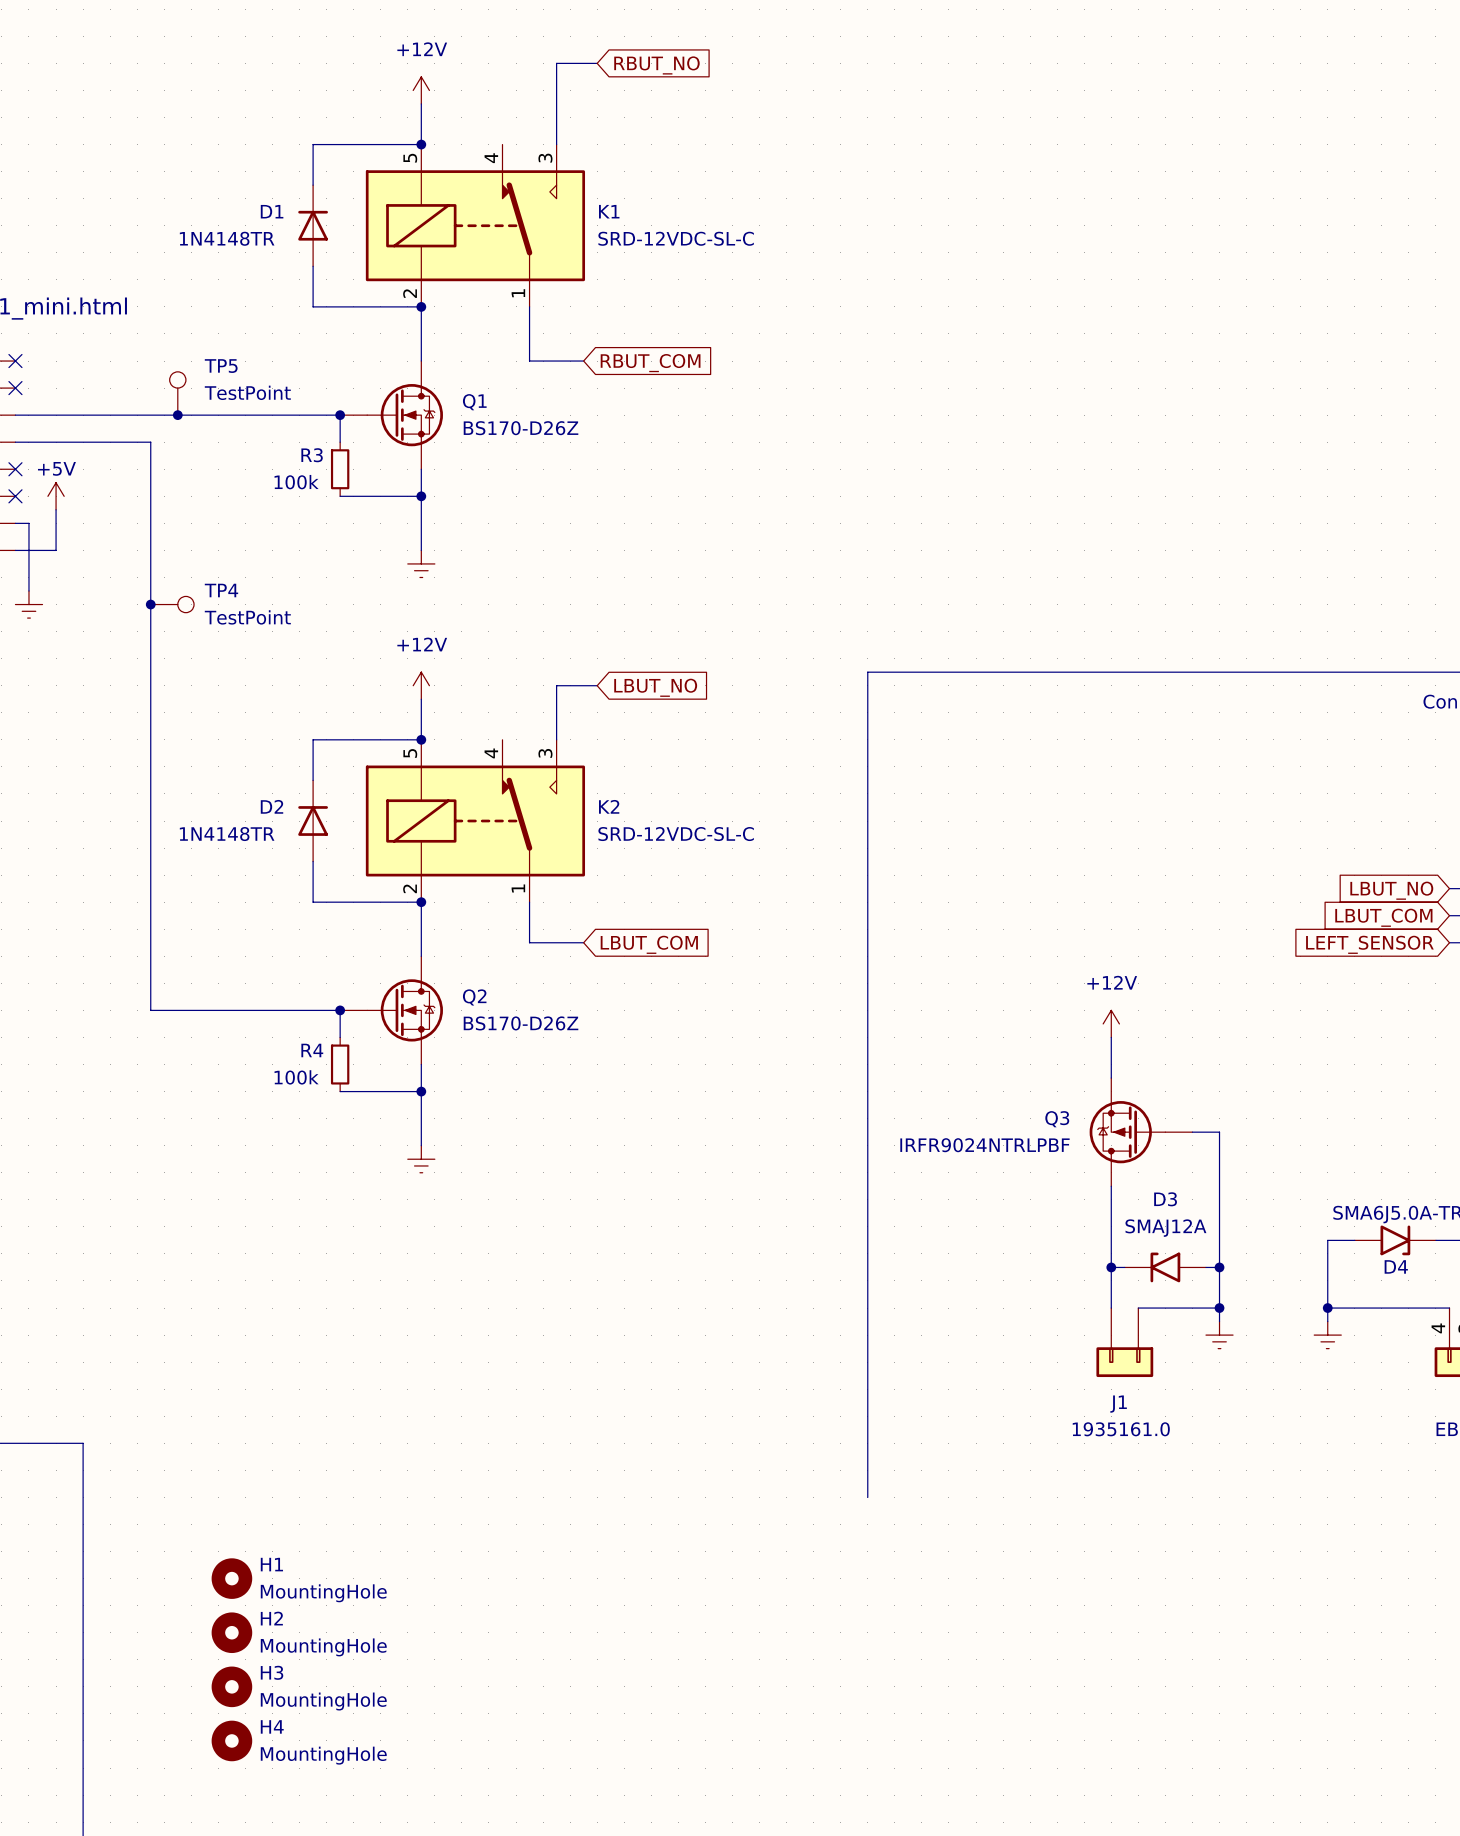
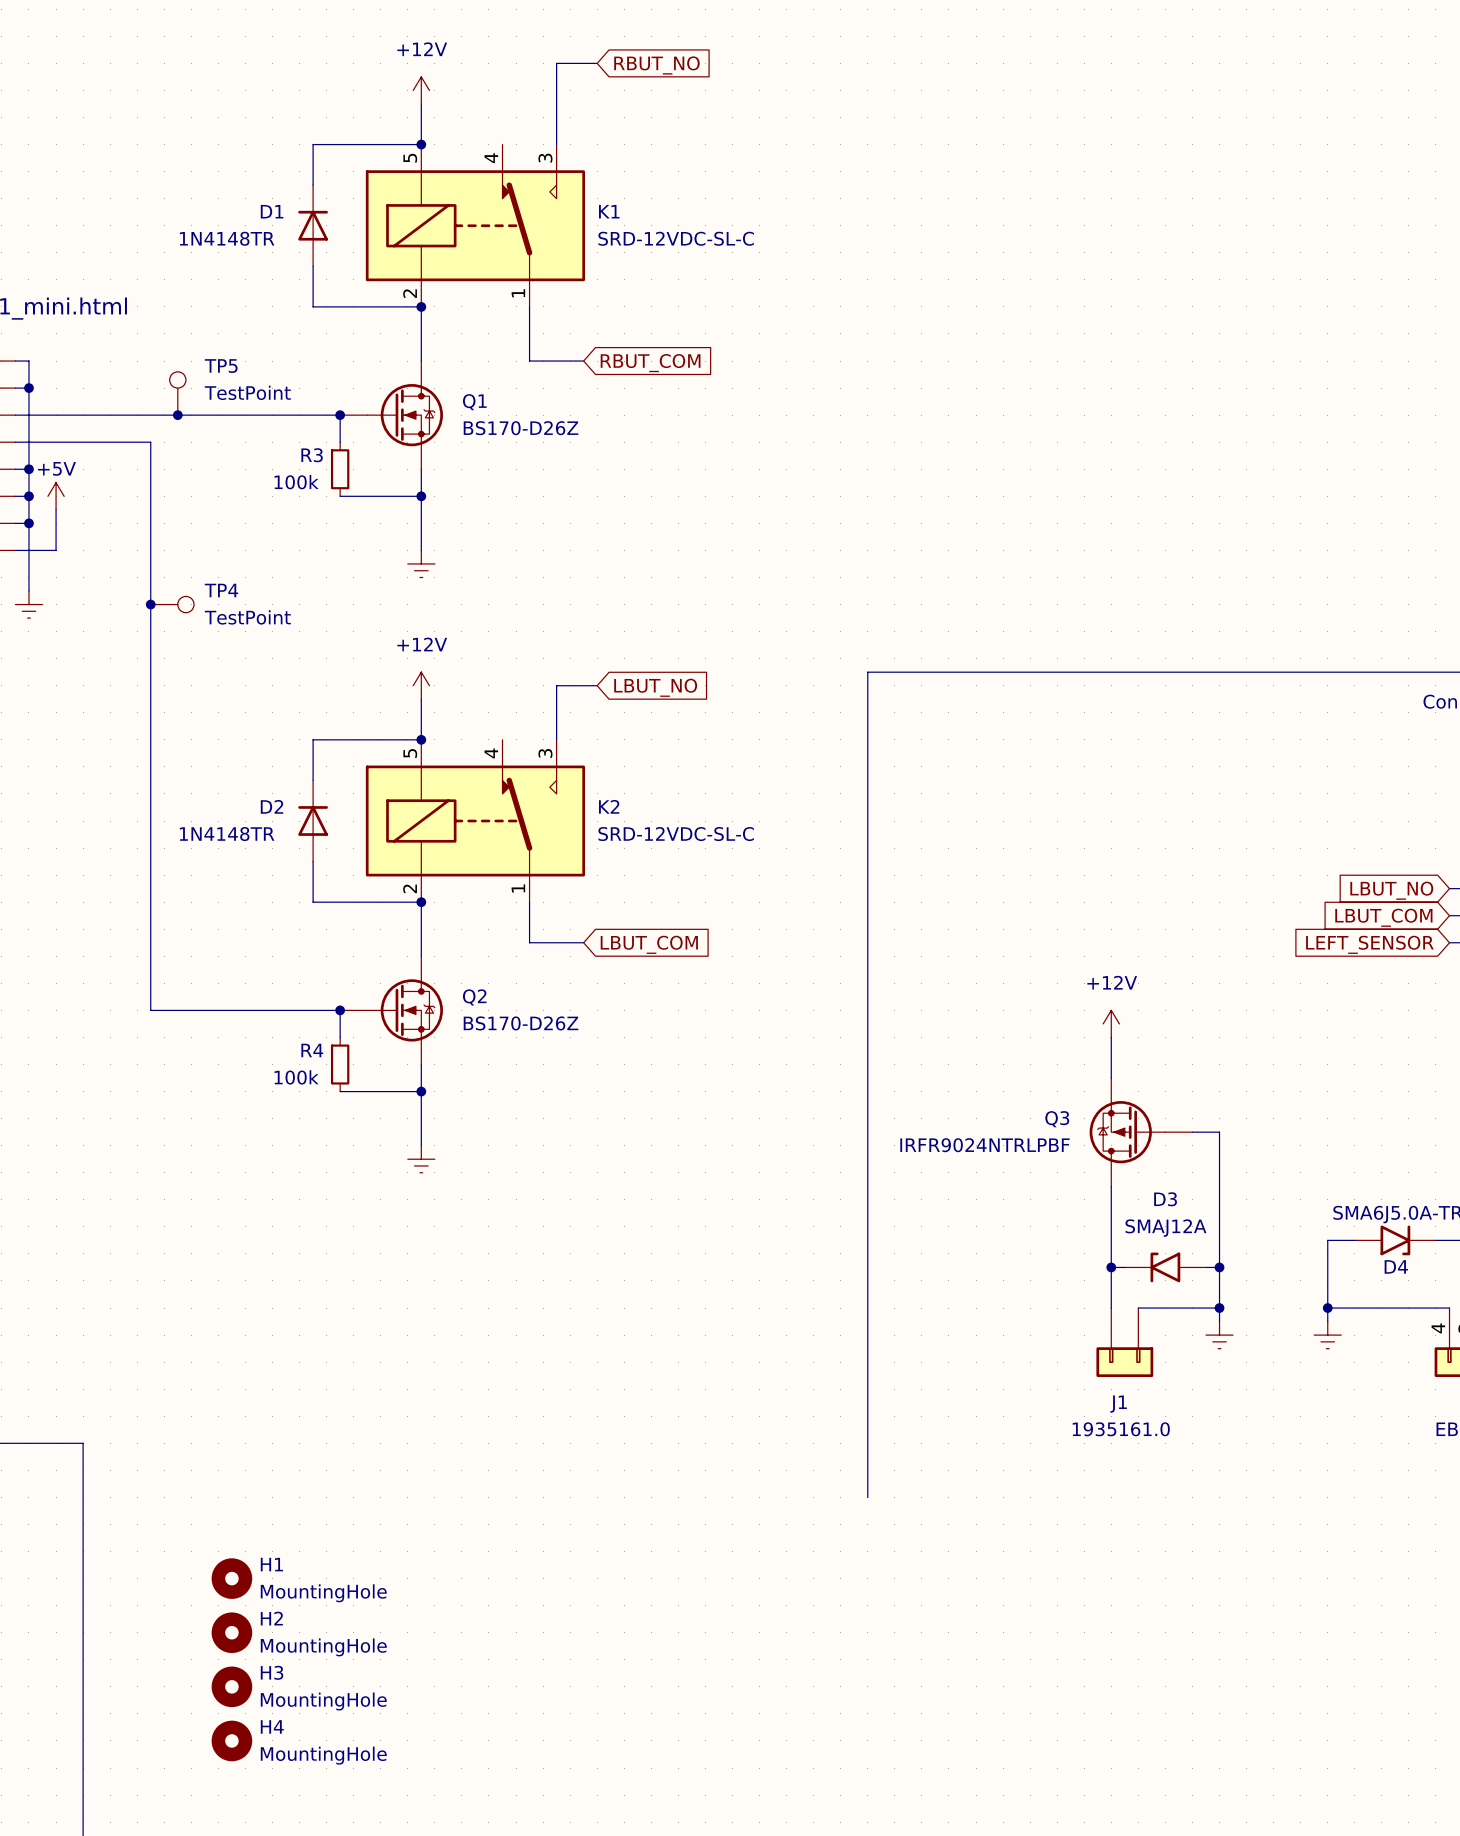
wire: none -> (15, 361) (28, 361) (28, 523)
no-connect mark: (15, 361) -> none
wire: none -> (15, 388) (28, 388)
no-connect mark: (15, 388) -> none
junction: none -> (28, 388)
wire: none -> (15, 469) (28, 469)
no-connect mark: (15, 469) -> none
junction: none -> (28, 469)
wire: none -> (15, 496) (28, 496)
no-connect mark: (15, 496) -> none
junction: none -> (28, 496)
junction: none -> (28, 523)

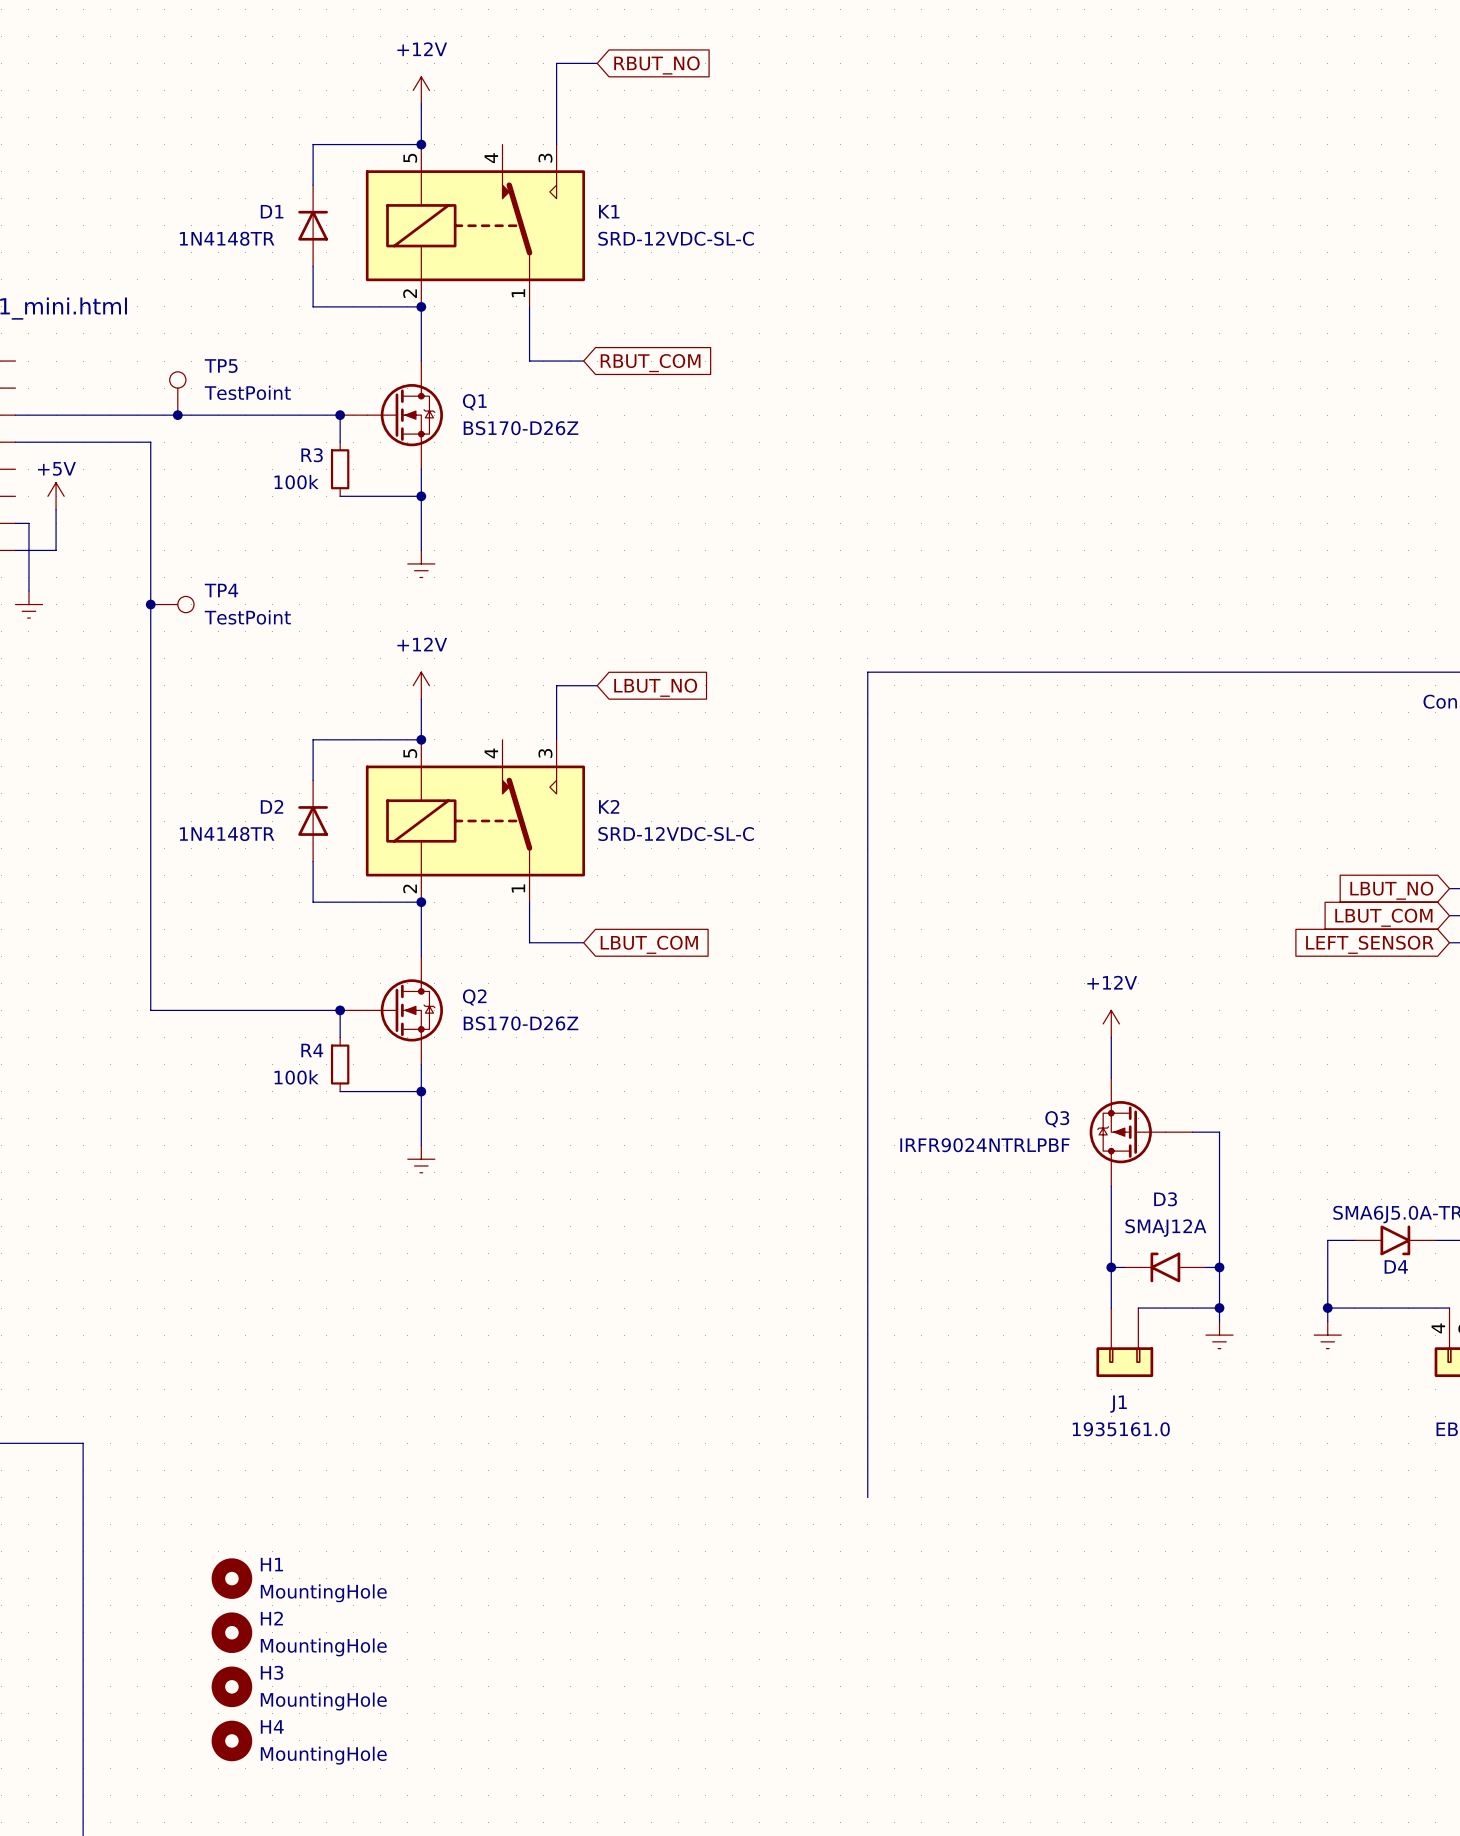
wire: (15, 361) (28, 361) (28, 523) -> none
wire: (15, 388) (28, 388) -> none
junction: (28, 388) -> none
wire: (15, 469) (28, 469) -> none
junction: (28, 469) -> none
wire: (15, 496) (28, 496) -> none
junction: (28, 496) -> none
junction: (28, 523) -> none

